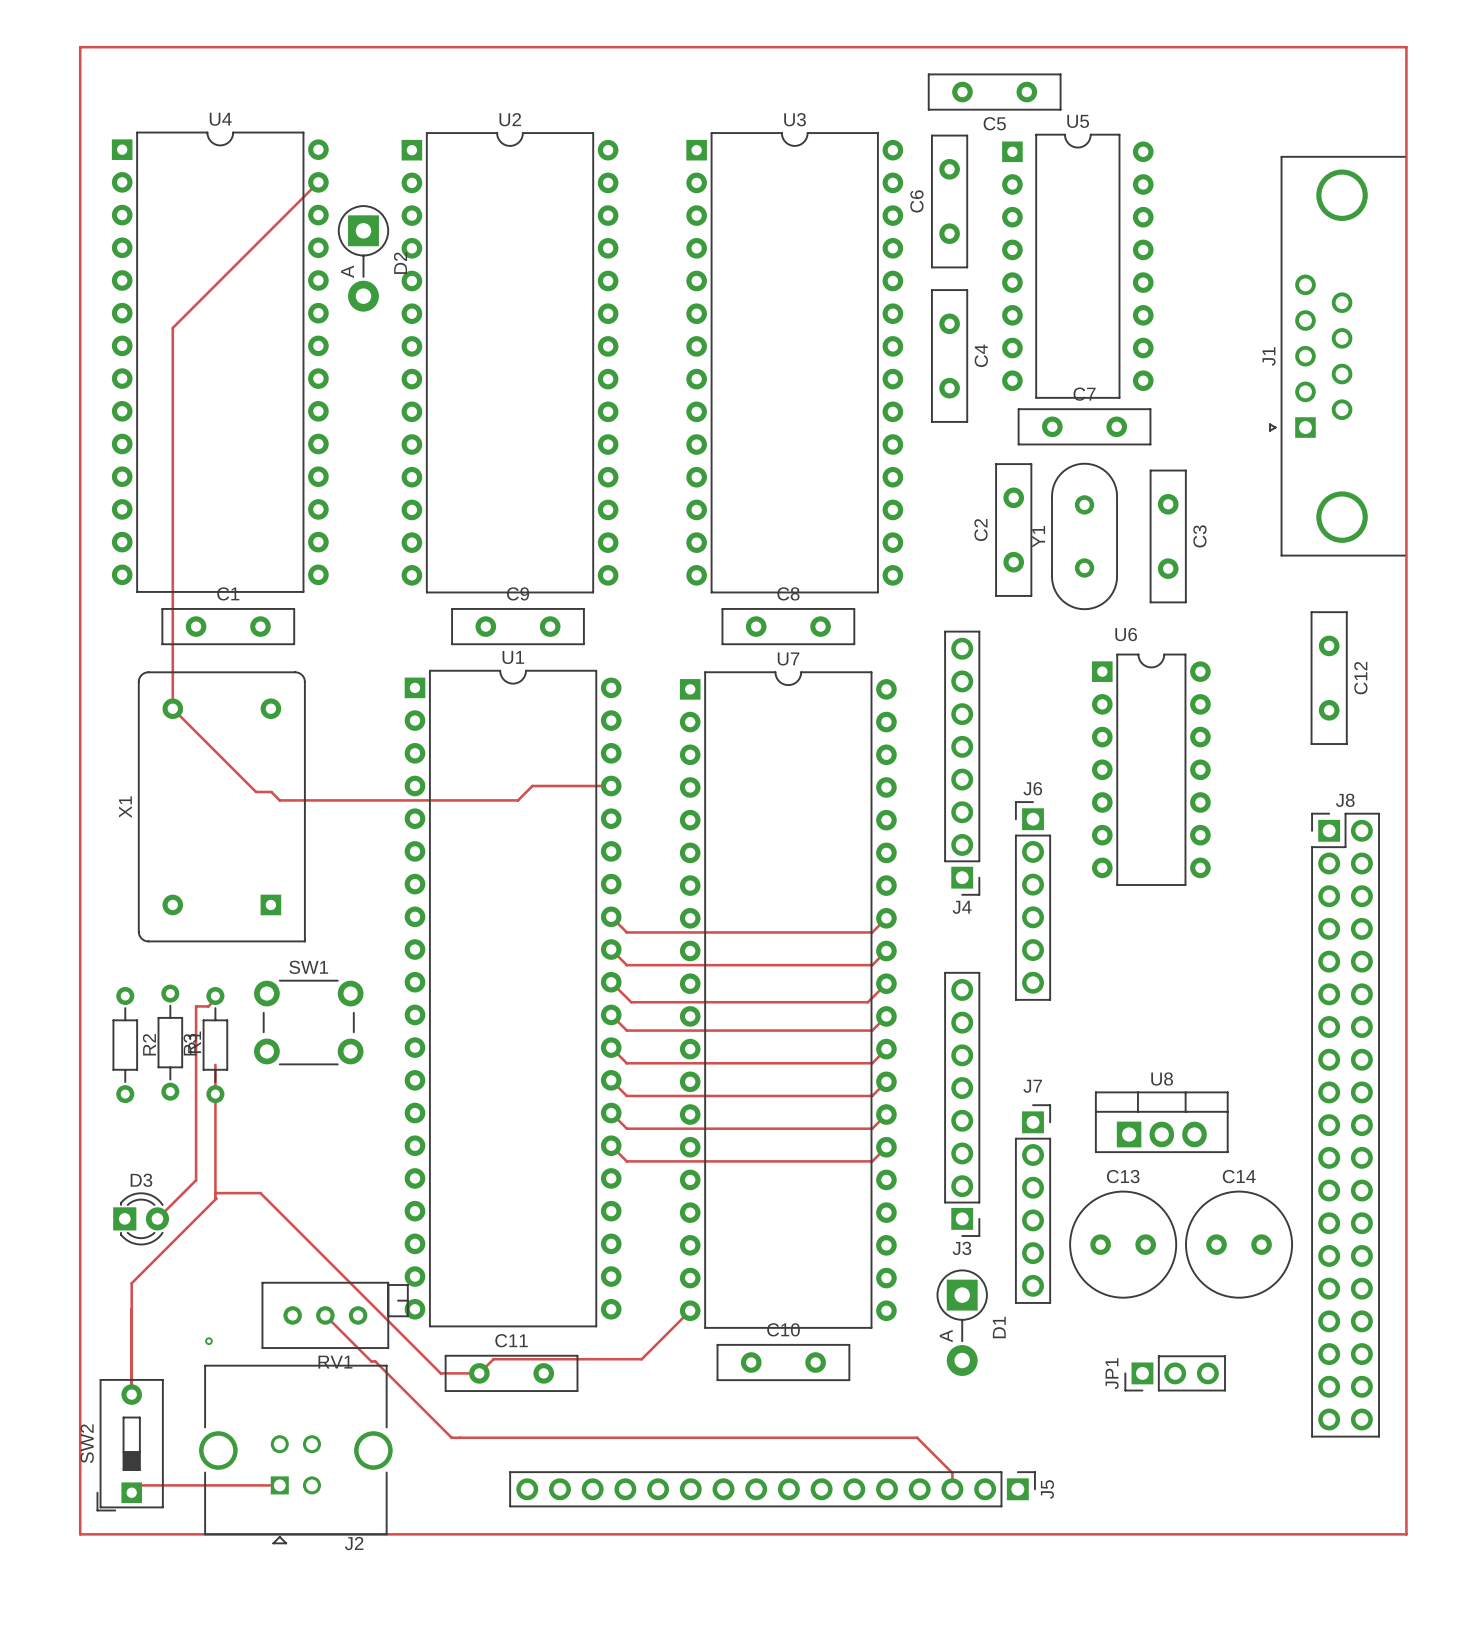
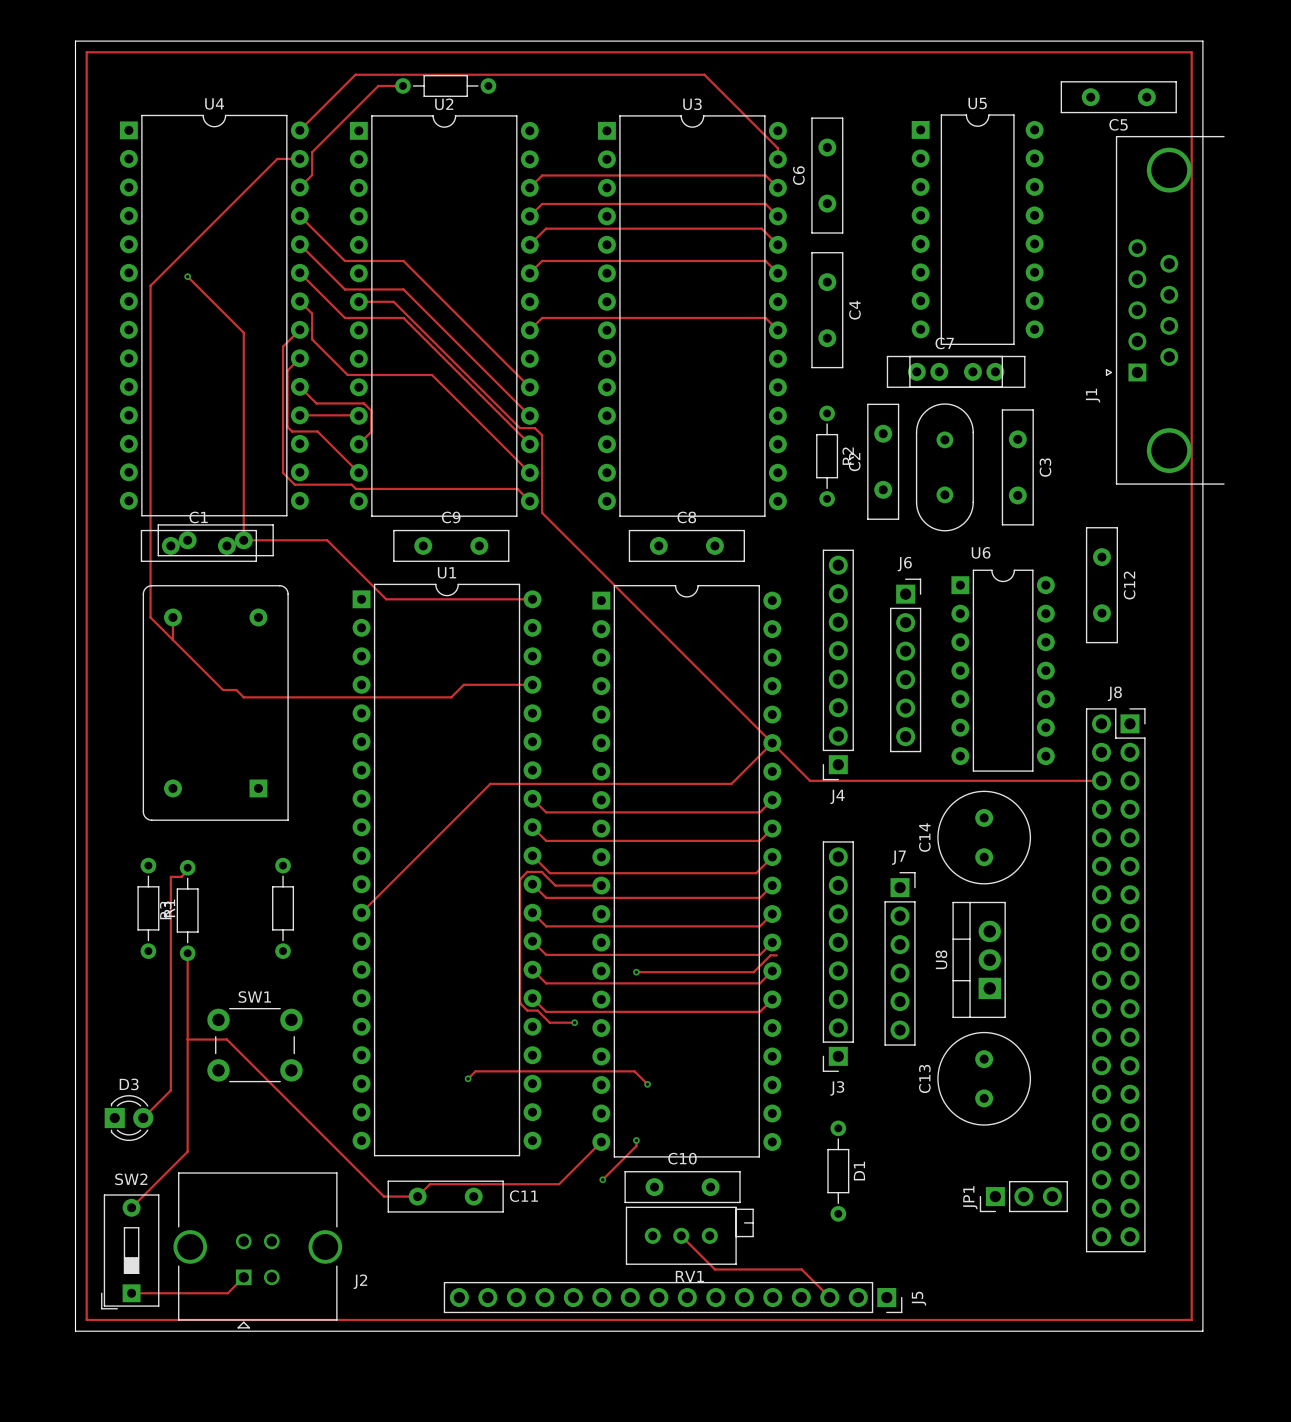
track: (80, 47) (1406, 47) (1406, 1534) (80, 1534) (80, 47) -> (86, 52) (86, 1319) (1191, 1319) (1191, 52) (86, 52)
board edge: none -> (75, 41) (1202, 41) (1202, 1331) (75, 1331) (75, 41)
C5 position: (994, 92) -> (1118, 97)
track: none -> (402, 85) (378, 85) (312, 152) (312, 175) (299, 187)
part: none -> (445, 85)
track: none -> (299, 130) (355, 74) (704, 74) (777, 148) (777, 159)
track: none -> (277, 158) (299, 158)
track: none -> (529, 187) (542, 175) (765, 175) (777, 187)
track: none -> (299, 215) (344, 260) (403, 260) (529, 387)
track: none -> (529, 216) (542, 203) (765, 203) (777, 216)
D2: (363, 258) -> none
U5 position: (1077, 266) -> (977, 229)
track: none -> (299, 244) (344, 289) (403, 289) (529, 415)
track: none -> (529, 244) (545, 228) (761, 228) (777, 244)
track: none -> (299, 272) (344, 317) (403, 317) (529, 444)
track: none -> (529, 273) (542, 260) (765, 260) (777, 273)
track: none -> (187, 276) (243, 332) (243, 540) (327, 540) (386, 599) (532, 599)
via: none -> (187, 276)
track: none -> (299, 301) (312, 313) (312, 339) (347, 374) (432, 374) (529, 472)
track: none -> (358, 301) (393, 301) (520, 428) (534, 428) (542, 435) (542, 512) (810, 780) (1101, 780)
J1 name position: J1 (1269, 356) -> J1 (1093, 395)
U4 position: (220, 362) -> (214, 315)
track: none -> (299, 329) (283, 346) (283, 472) (294, 484) (351, 484) (355, 488) (517, 488) (529, 501)
track: none -> (529, 330) (542, 317) (765, 317) (777, 330)
track: none -> (299, 358) (287, 370) (287, 427) (292, 431) (317, 431) (358, 472)
part: none -> (967, 371)
track: none -> (299, 386) (316, 403) (363, 403) (371, 410) (371, 431) (358, 444)
track: none -> (299, 415) (358, 415)
Y1 name: Y1 (1038, 536) -> none
part: none -> (215, 540)
J4 footprint: [944, 630, 981, 896] -> [822, 549, 854, 781]
U7 name: U7 (788, 658) -> none
C12 position: (1329, 678) -> (1101, 585)
track: none -> (172, 617) (172, 639)
J6 footprint: [1015, 801, 1051, 1001] -> [890, 578, 922, 753]
X1: (221, 806) -> none
part: none -> (215, 702)
J8 footprint: [1311, 812, 1380, 1438] -> [1085, 708, 1146, 1253]
track: none -> (772, 743) (731, 783) (490, 783) (361, 912)
J3 footprint: [944, 972, 981, 1237] -> [822, 841, 854, 1072]
track: none -> (601, 885) (555, 885) (541, 871) (527, 871) (520, 879) (520, 1003) (527, 1010) (537, 1010) (549, 1022) (574, 1022)
SW1 position: (308, 1022) -> (254, 1045)
part: none -> (283, 908)
R2 position: (125, 1045) -> (827, 456)
track: (215, 1064) (215, 1094) -> none
track: none -> (776, 955) (770, 955) (753, 972) (636, 972)
via: none -> (636, 972)
U8 rotation: 0° (1161, 1122) -> 90° counterclockwise (979, 959)
via: none -> (574, 1022)
C13 name position: C13 (1123, 1176) -> C13 (924, 1078)
C14 name position: C14 (1239, 1176) -> C14 (924, 837)
track: (196, 1180) (157, 1218) -> (170, 1028) (170, 1090) (143, 1118)
track: (215, 1197) (131, 1283) (131, 1394) -> (187, 1043) (187, 1151) (131, 1207)
J7 position: (1033, 1204) -> (900, 958)
D3 position: (141, 1218) -> (129, 1118)
track: none -> (468, 1078) (475, 1071) (634, 1071) (647, 1084)
via: none -> (468, 1078)
via: none -> (647, 1084)
C13 rotation: 0° (1123, 1244) -> 90° clockwise (984, 1078)
C14 rotation: 0° (1239, 1244) -> 90° clockwise (984, 837)
C14 position: (1239, 1244) -> (984, 837)
D1 footprint: [936, 1269, 988, 1376] -> [827, 1120, 850, 1222]
track: none -> (636, 1140) (636, 1146) (602, 1179)
via: none -> (636, 1140)
track: (325, 1315) (371, 1361) (375, 1361) (451, 1437) (917, 1437) (952, 1473) (952, 1489) -> (681, 1235) (714, 1269) (801, 1269) (829, 1297)
RV1 position: (335, 1315) -> (689, 1235)
C11 name position: C11 (511, 1340) -> C11 (523, 1196)
via: (208, 1341) -> none
via: none -> (602, 1179)
SW2 name rotation: 0° (87, 1443) -> 90° clockwise (131, 1179)
SW2 name position: SW2 (87, 1443) -> SW2 (131, 1179)
SW2 position: (130, 1445) -> (130, 1251)
J2 position: (295, 1454) -> (257, 1250)
track: none -> (243, 1277) (227, 1293) (131, 1293)
J5 footprint: [509, 1471, 1036, 1508] -> [443, 1281, 903, 1314]
track: (279, 1485) (139, 1485) (131, 1492) -> none
J2 name position: J2 (354, 1543) -> J2 (360, 1281)

